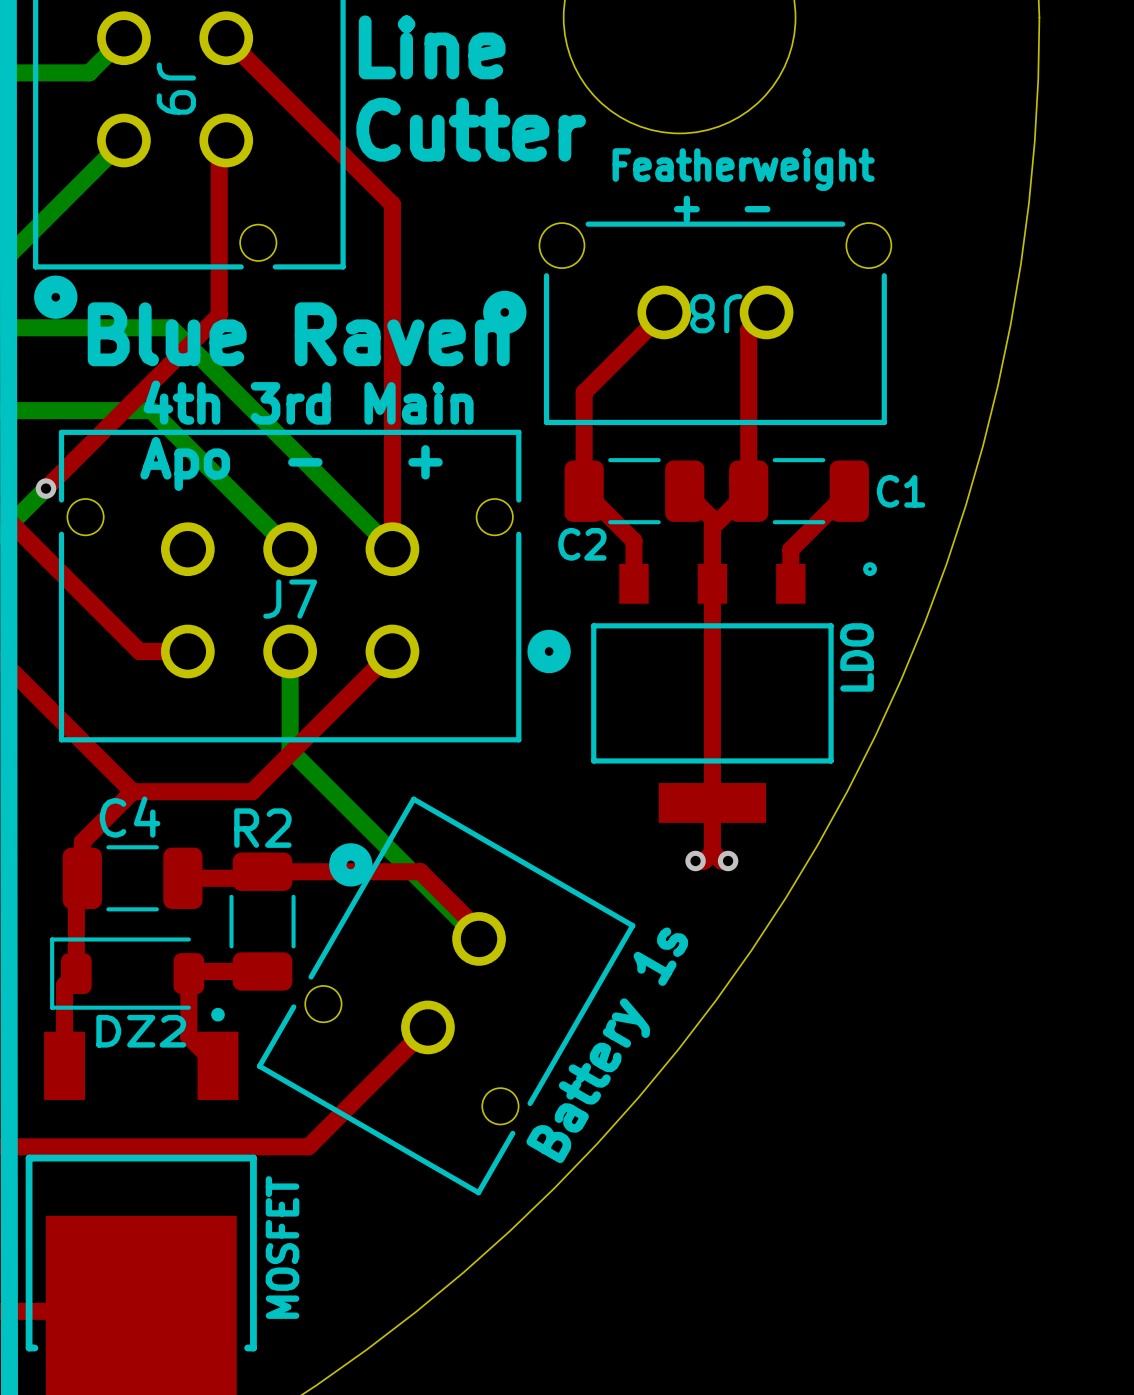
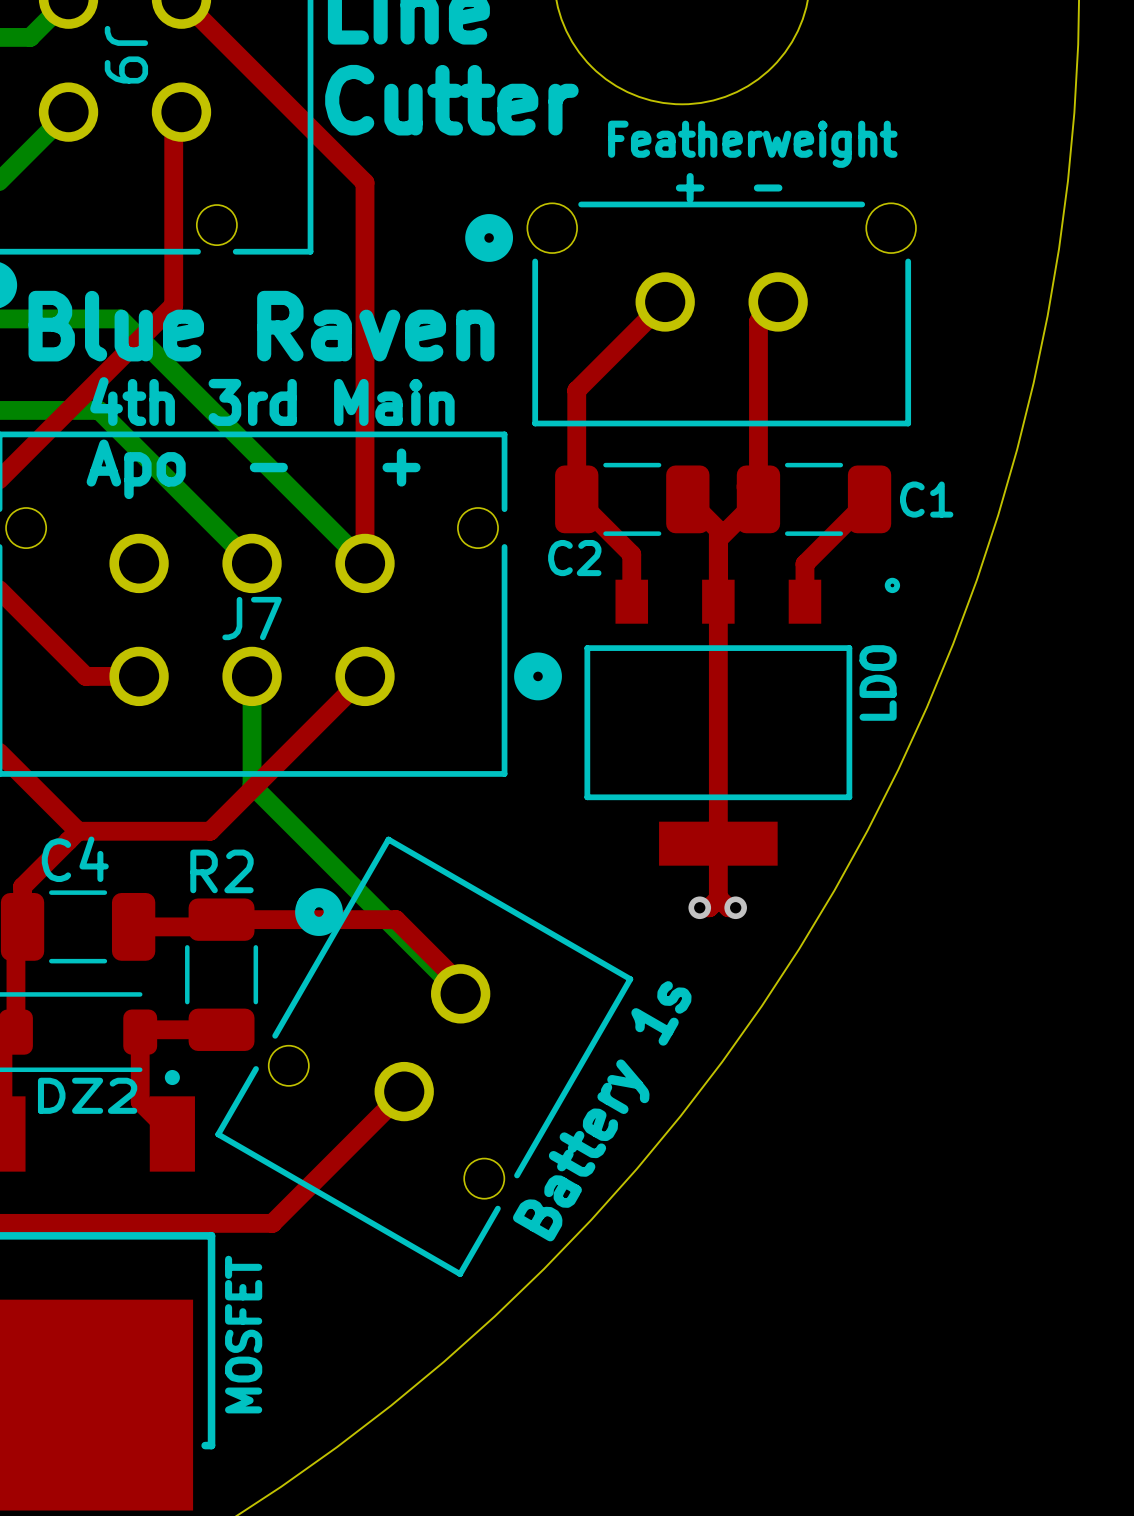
J8: (687, 323) -> none
part: none -> (690, 313)

